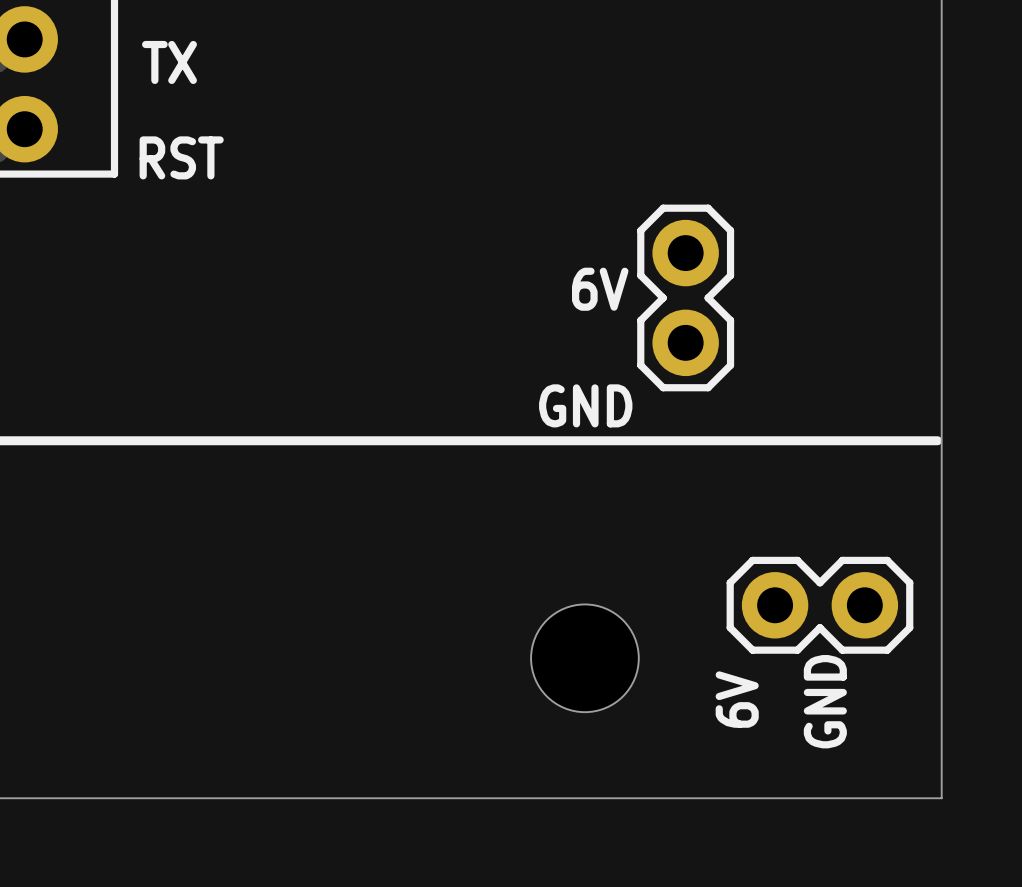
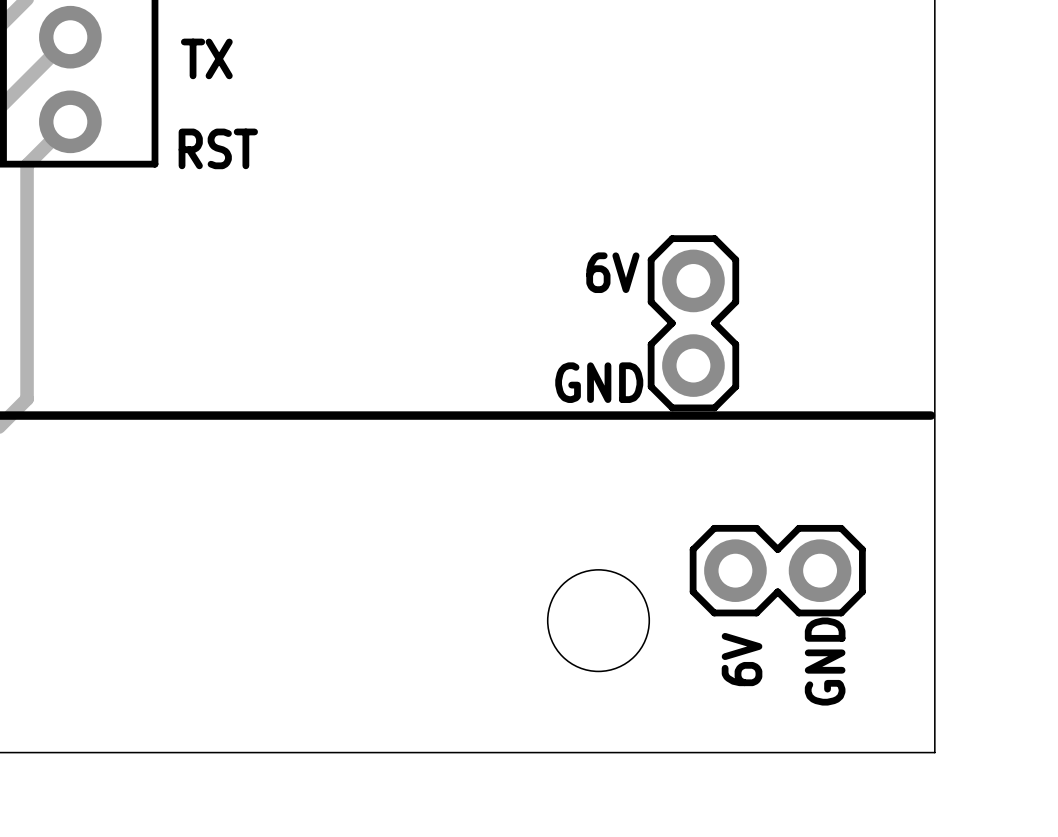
part position: (685, 297) -> (693, 323)
part position: (819, 605) -> (777, 570)

